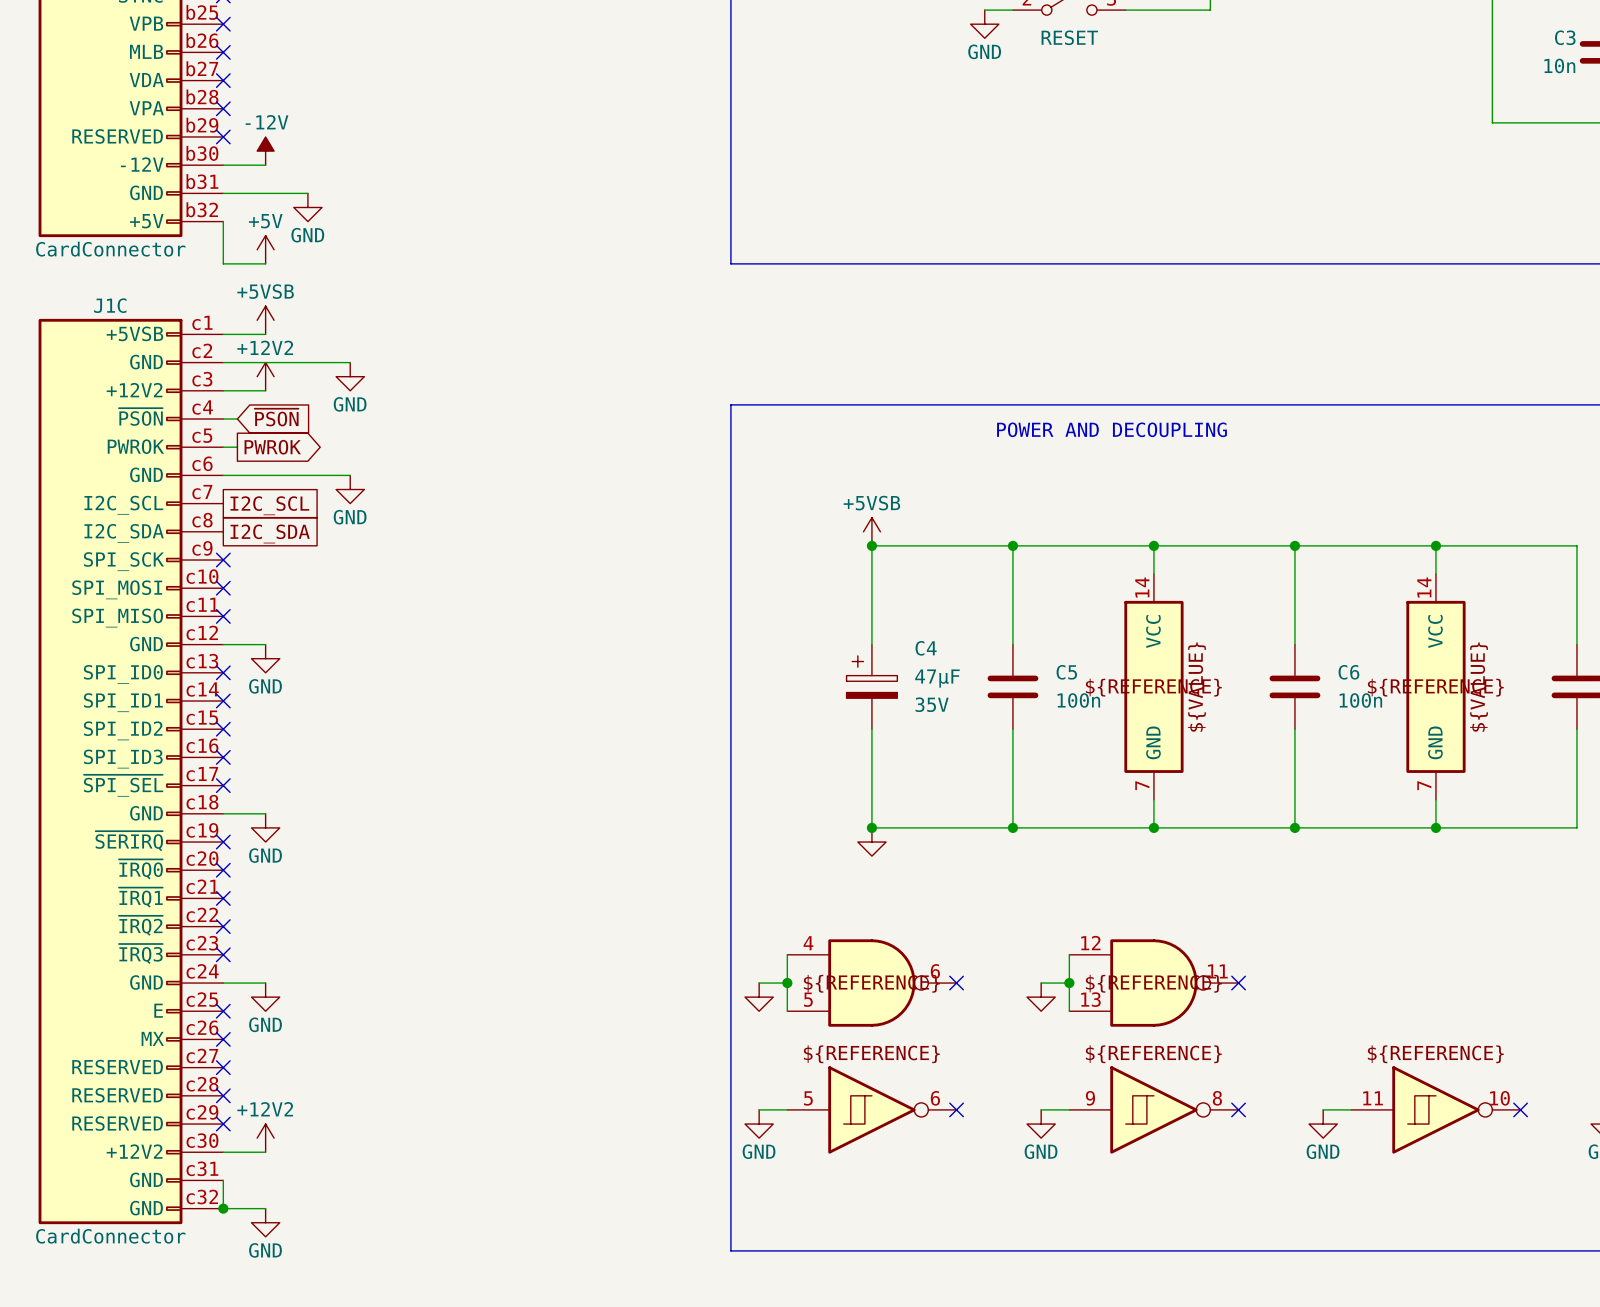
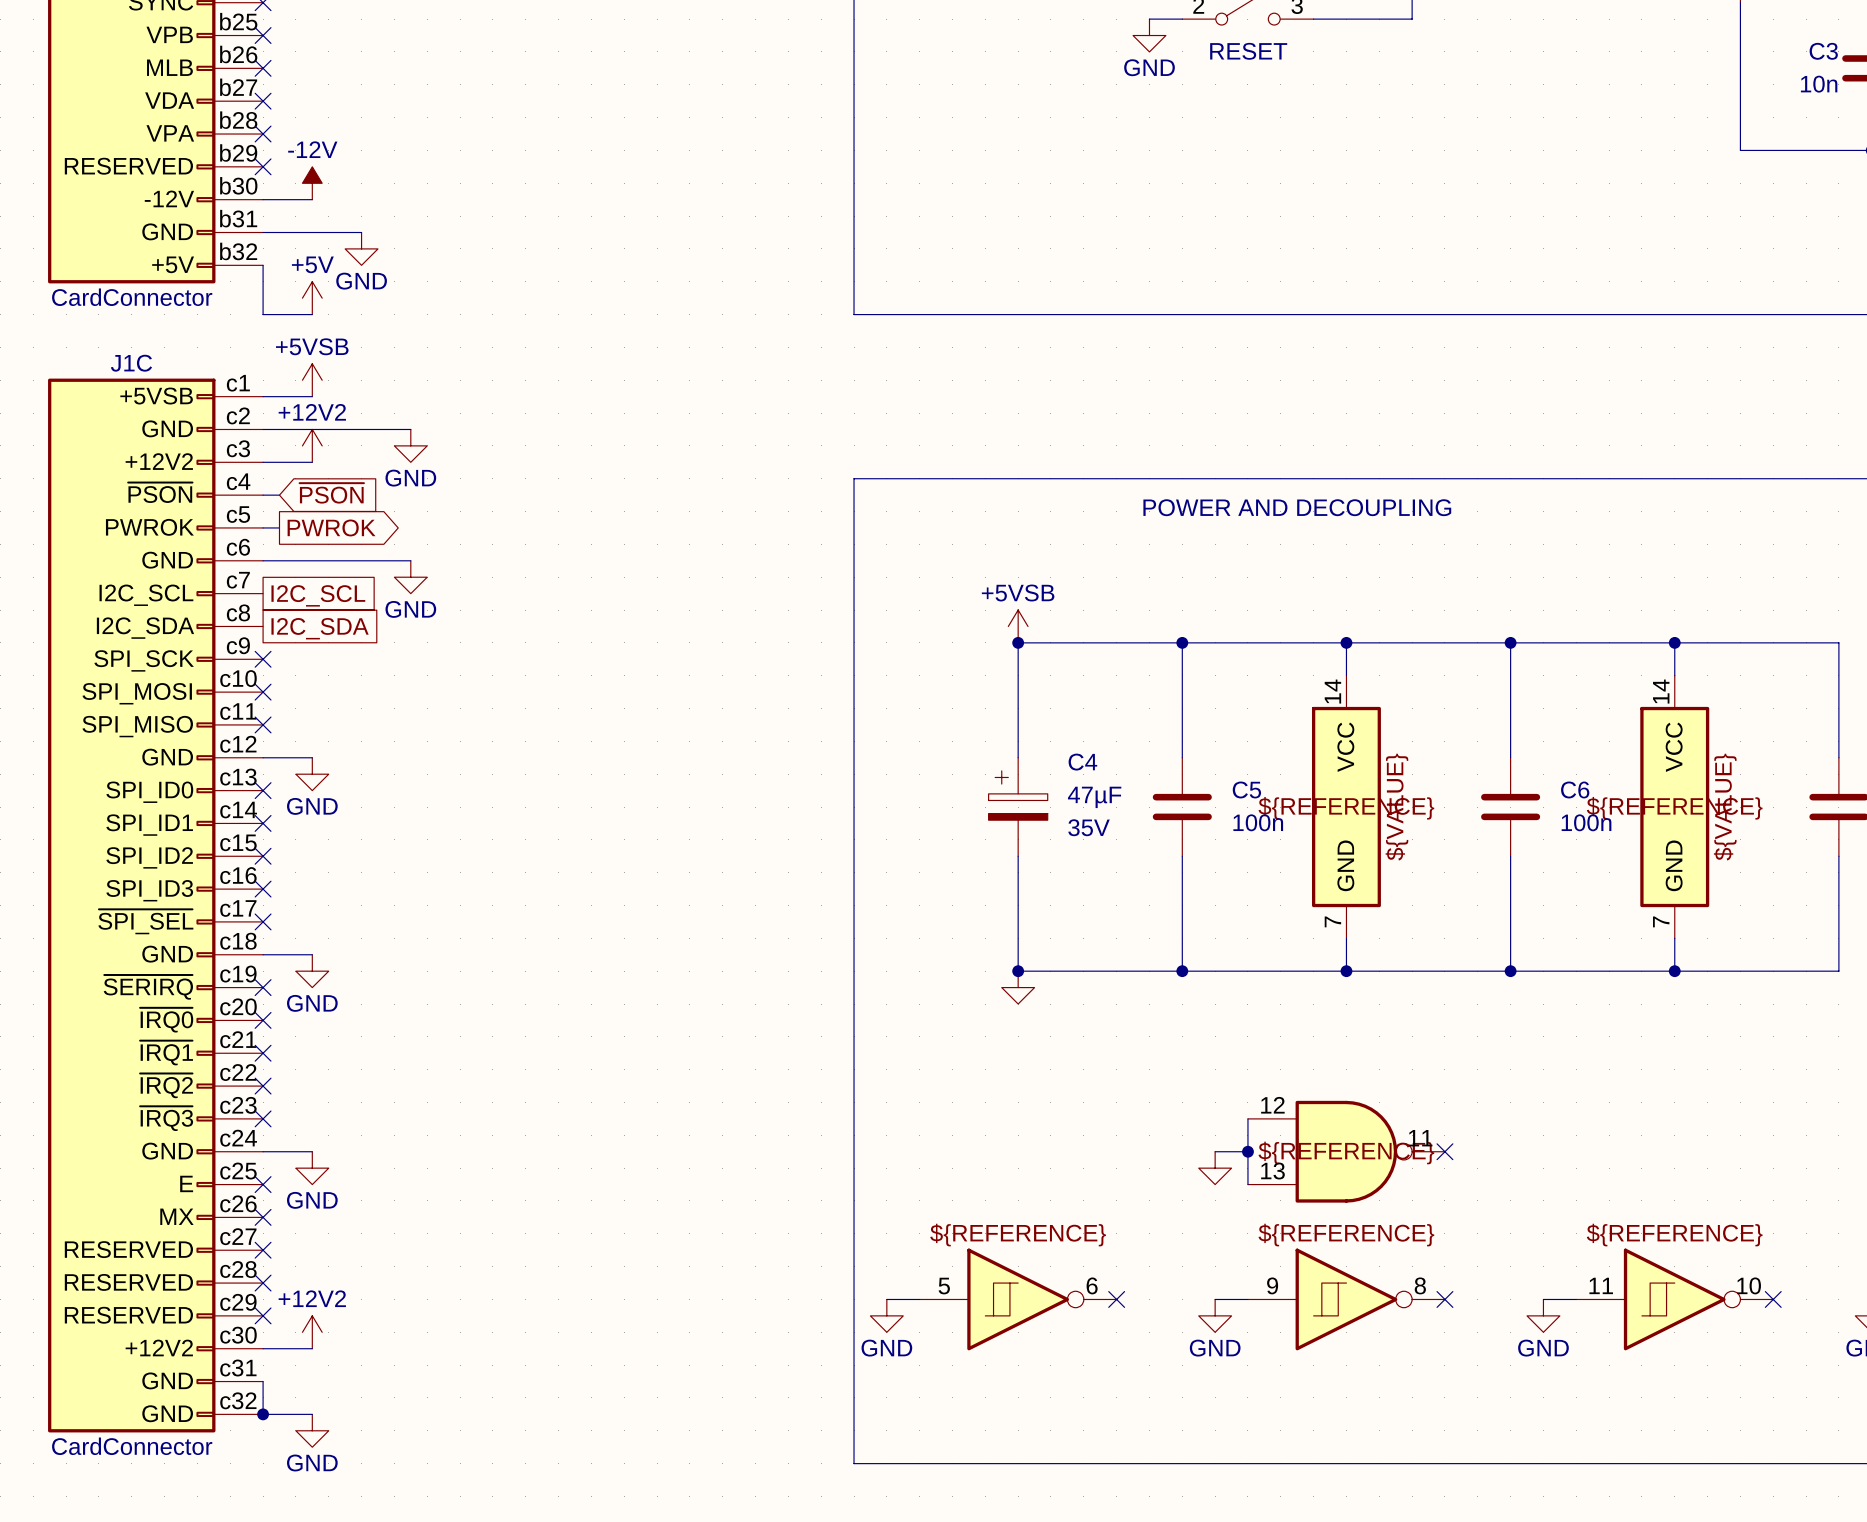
wire: (787, 954) (787, 1011) -> none
wire: (759, 983) (787, 983) -> none
junction: (787, 983) -> none
part: (871, 983) -> none
no-connect mark: (956, 983) -> none
power symbol: (759, 997) -> none

